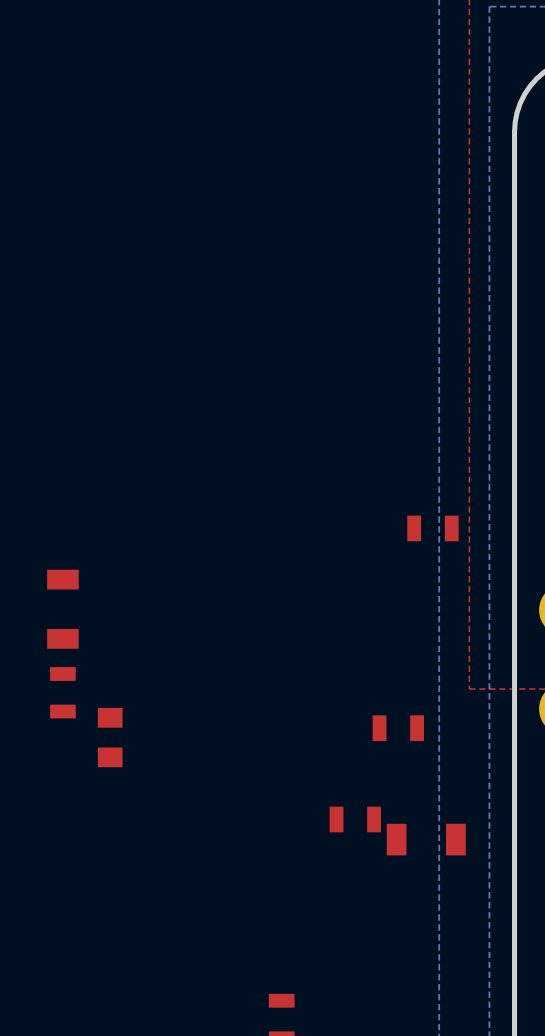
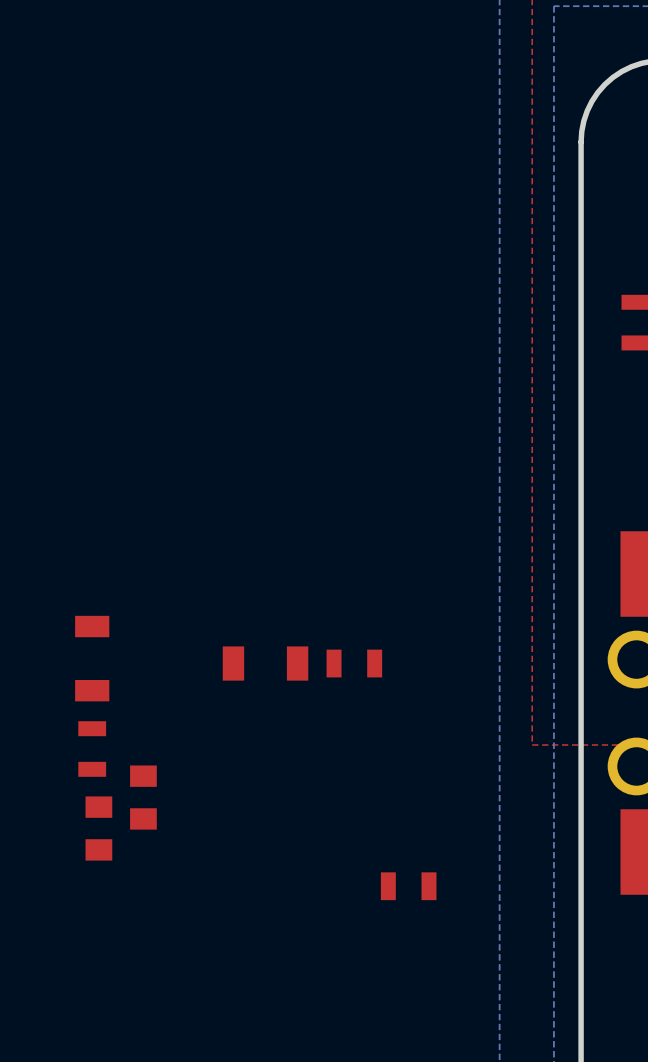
part: (432, 528) -> none
part: none -> (354, 663)
part: (398, 728) -> none
part: none -> (98, 828)
part position: (426, 839) -> (265, 663)

